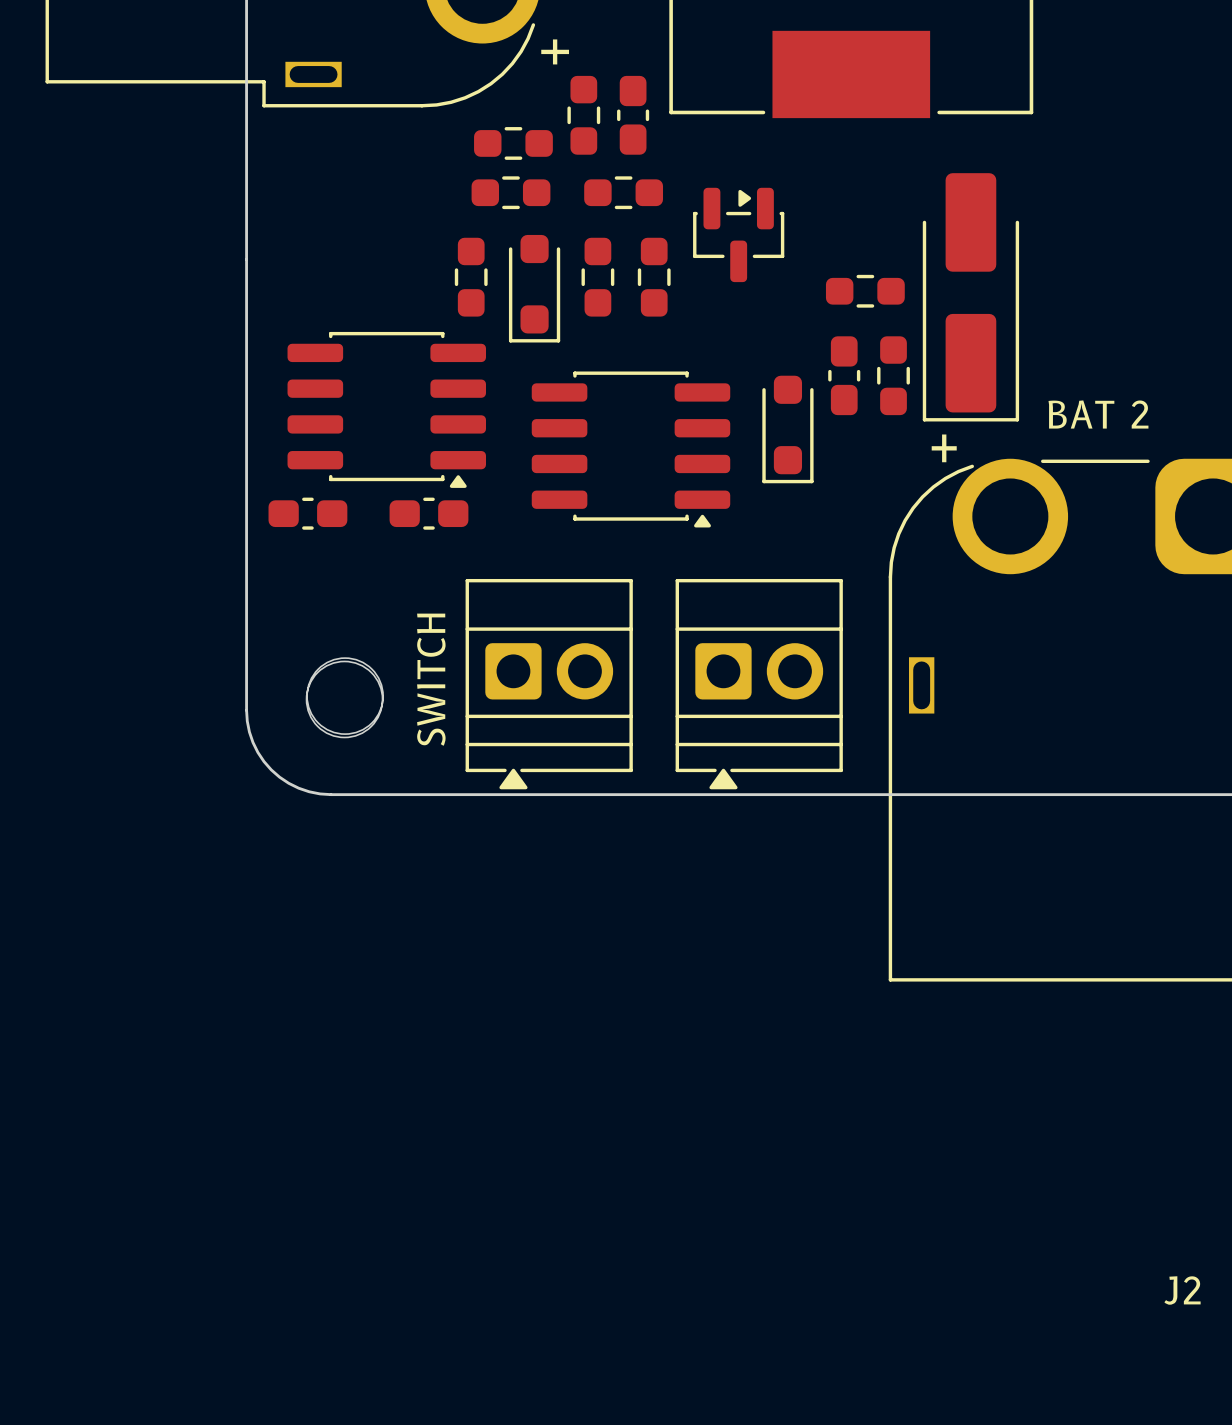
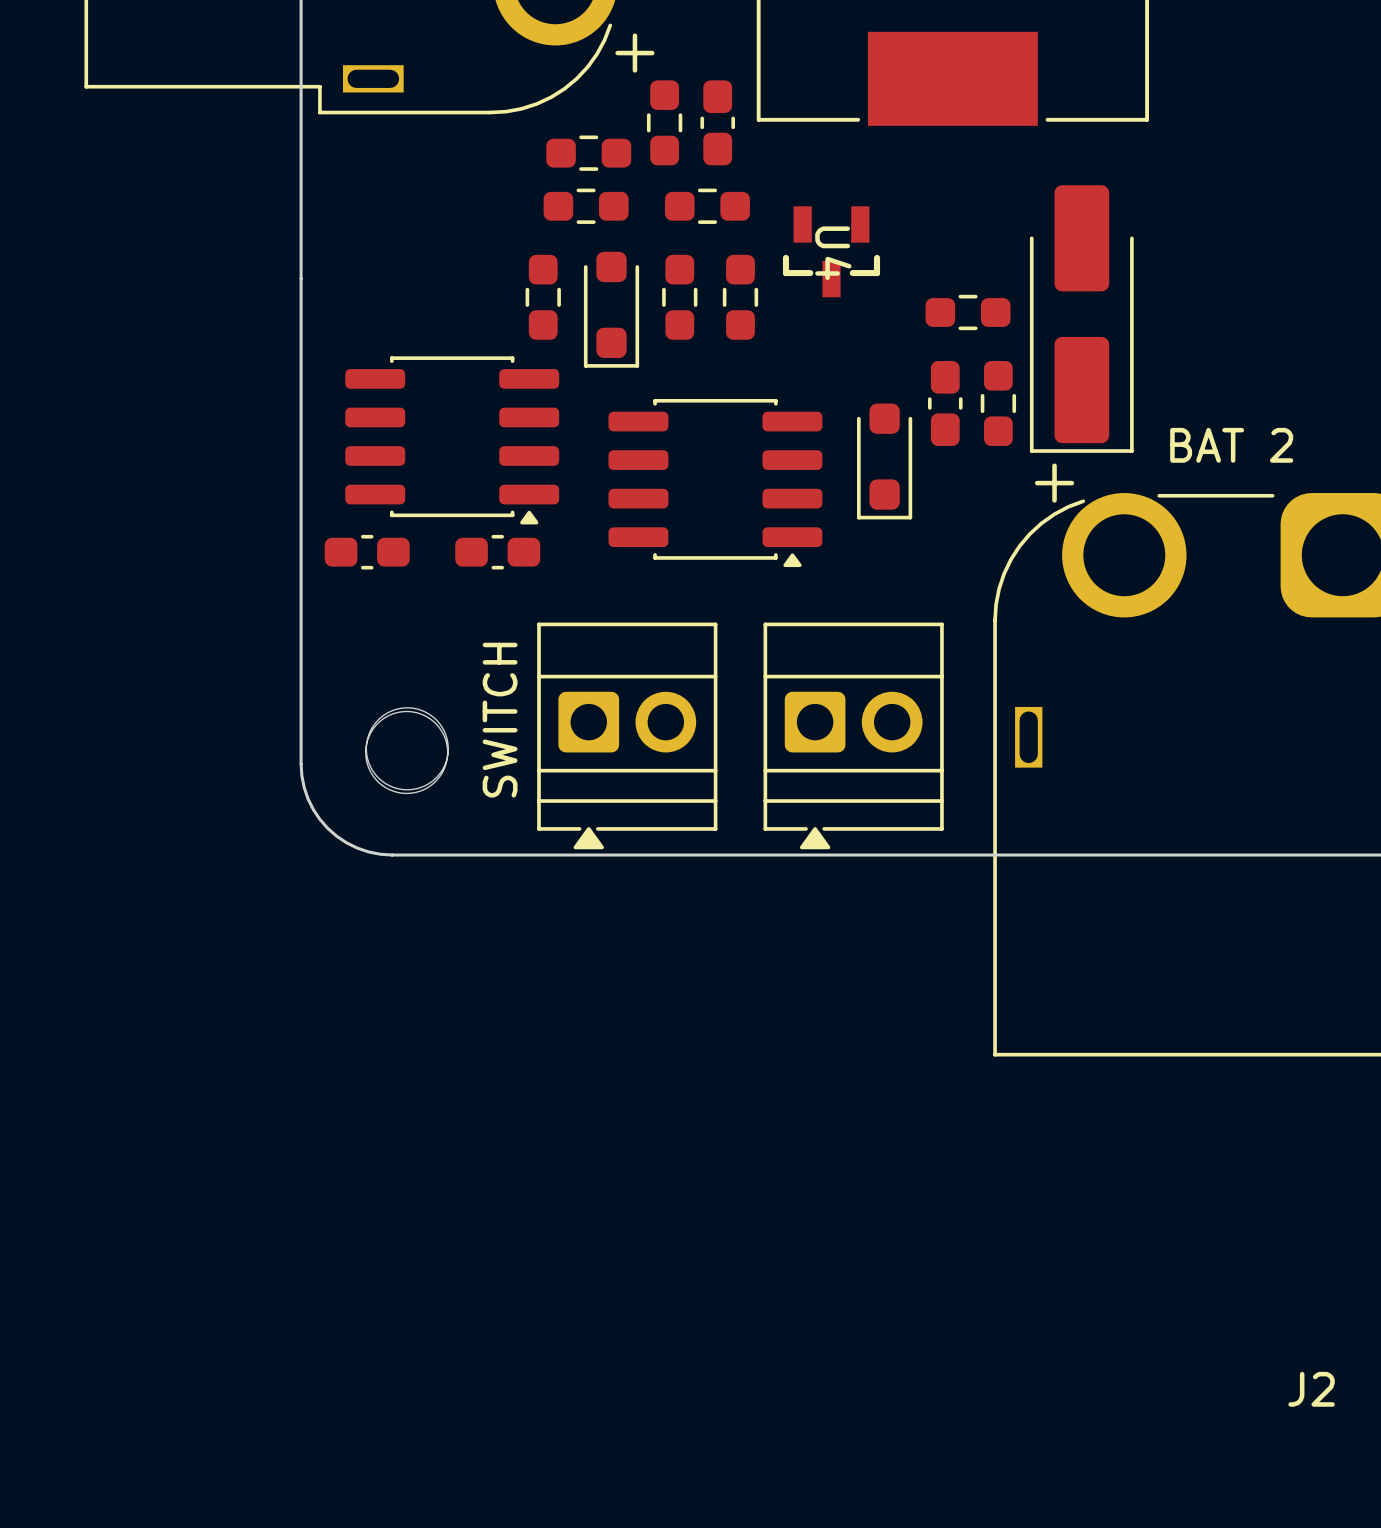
part: (738, 234) -> none
U4: none -> (831, 251)

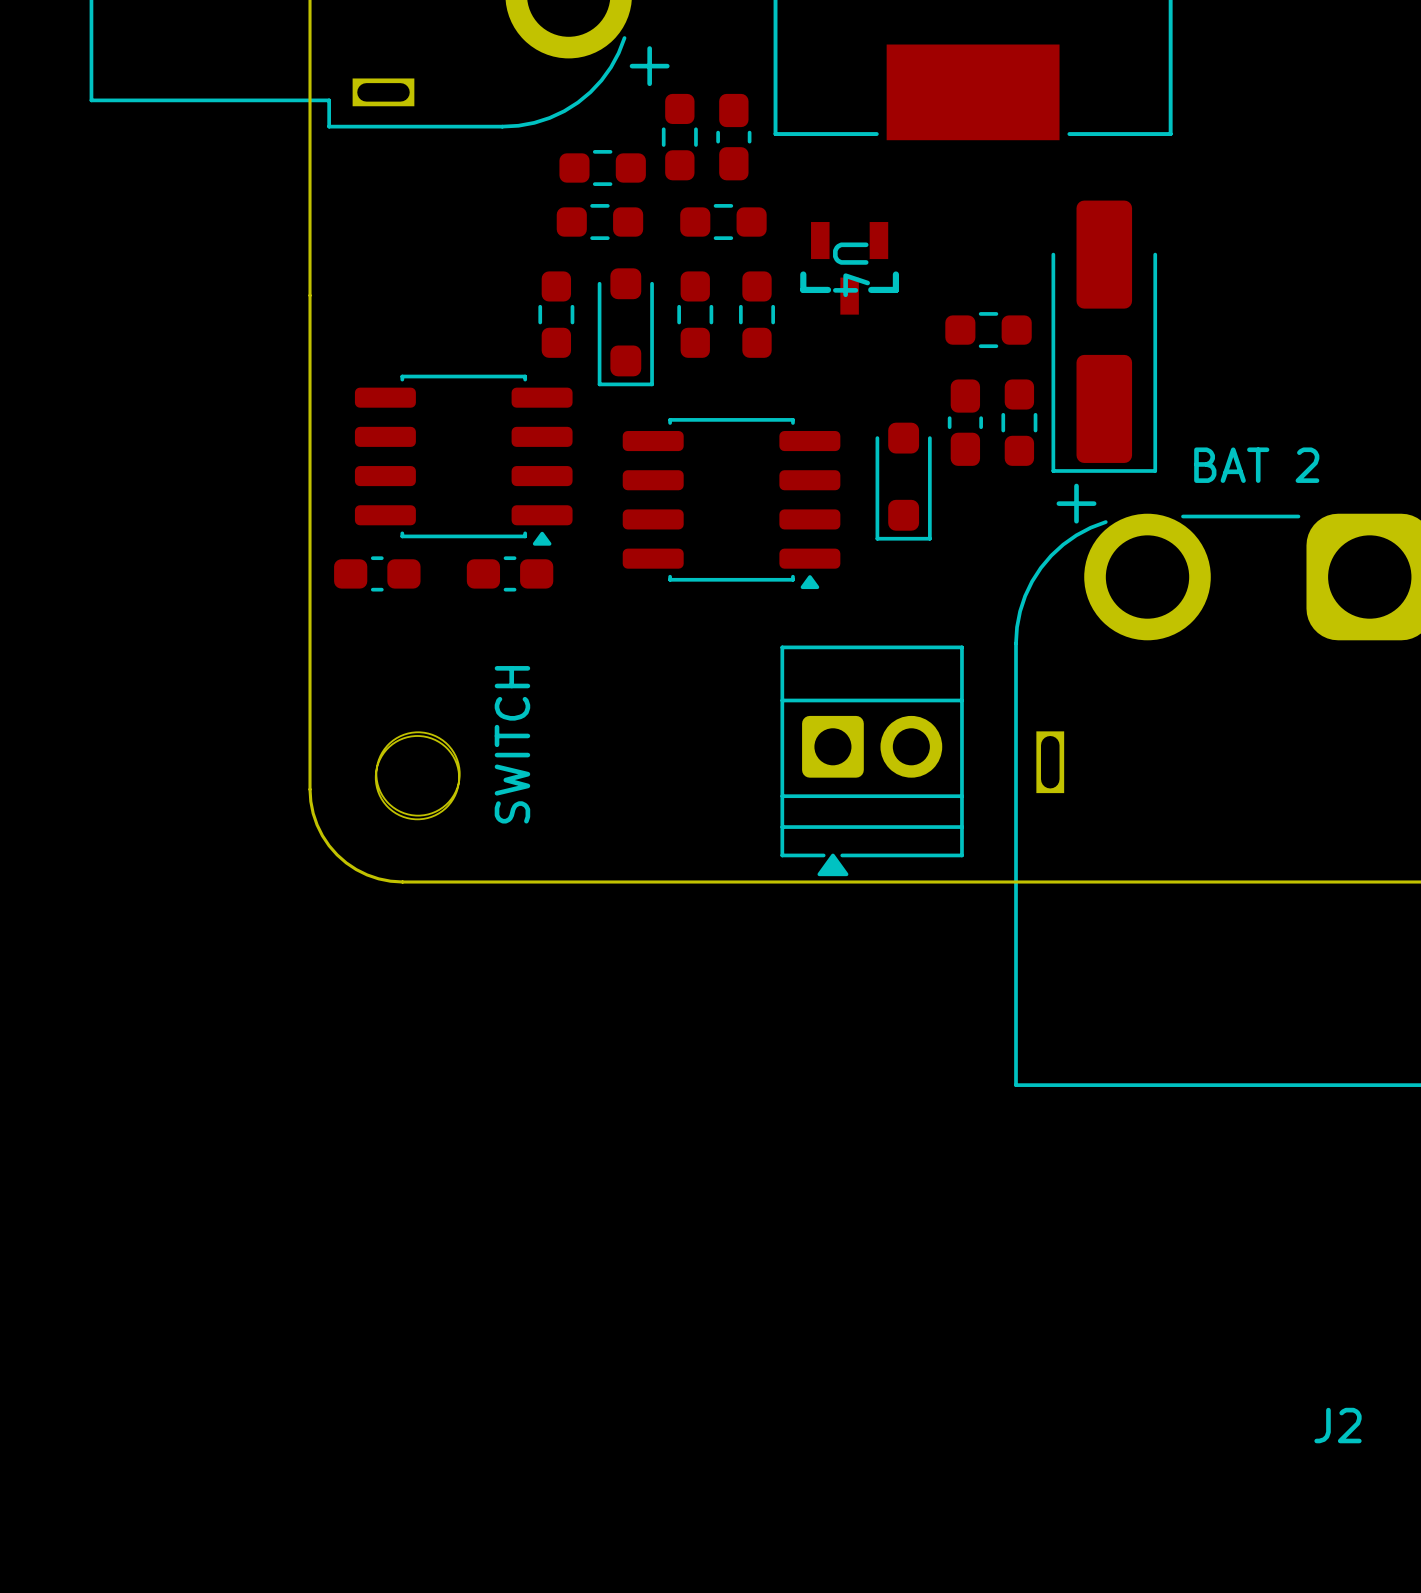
part: (627, 735) -> none

